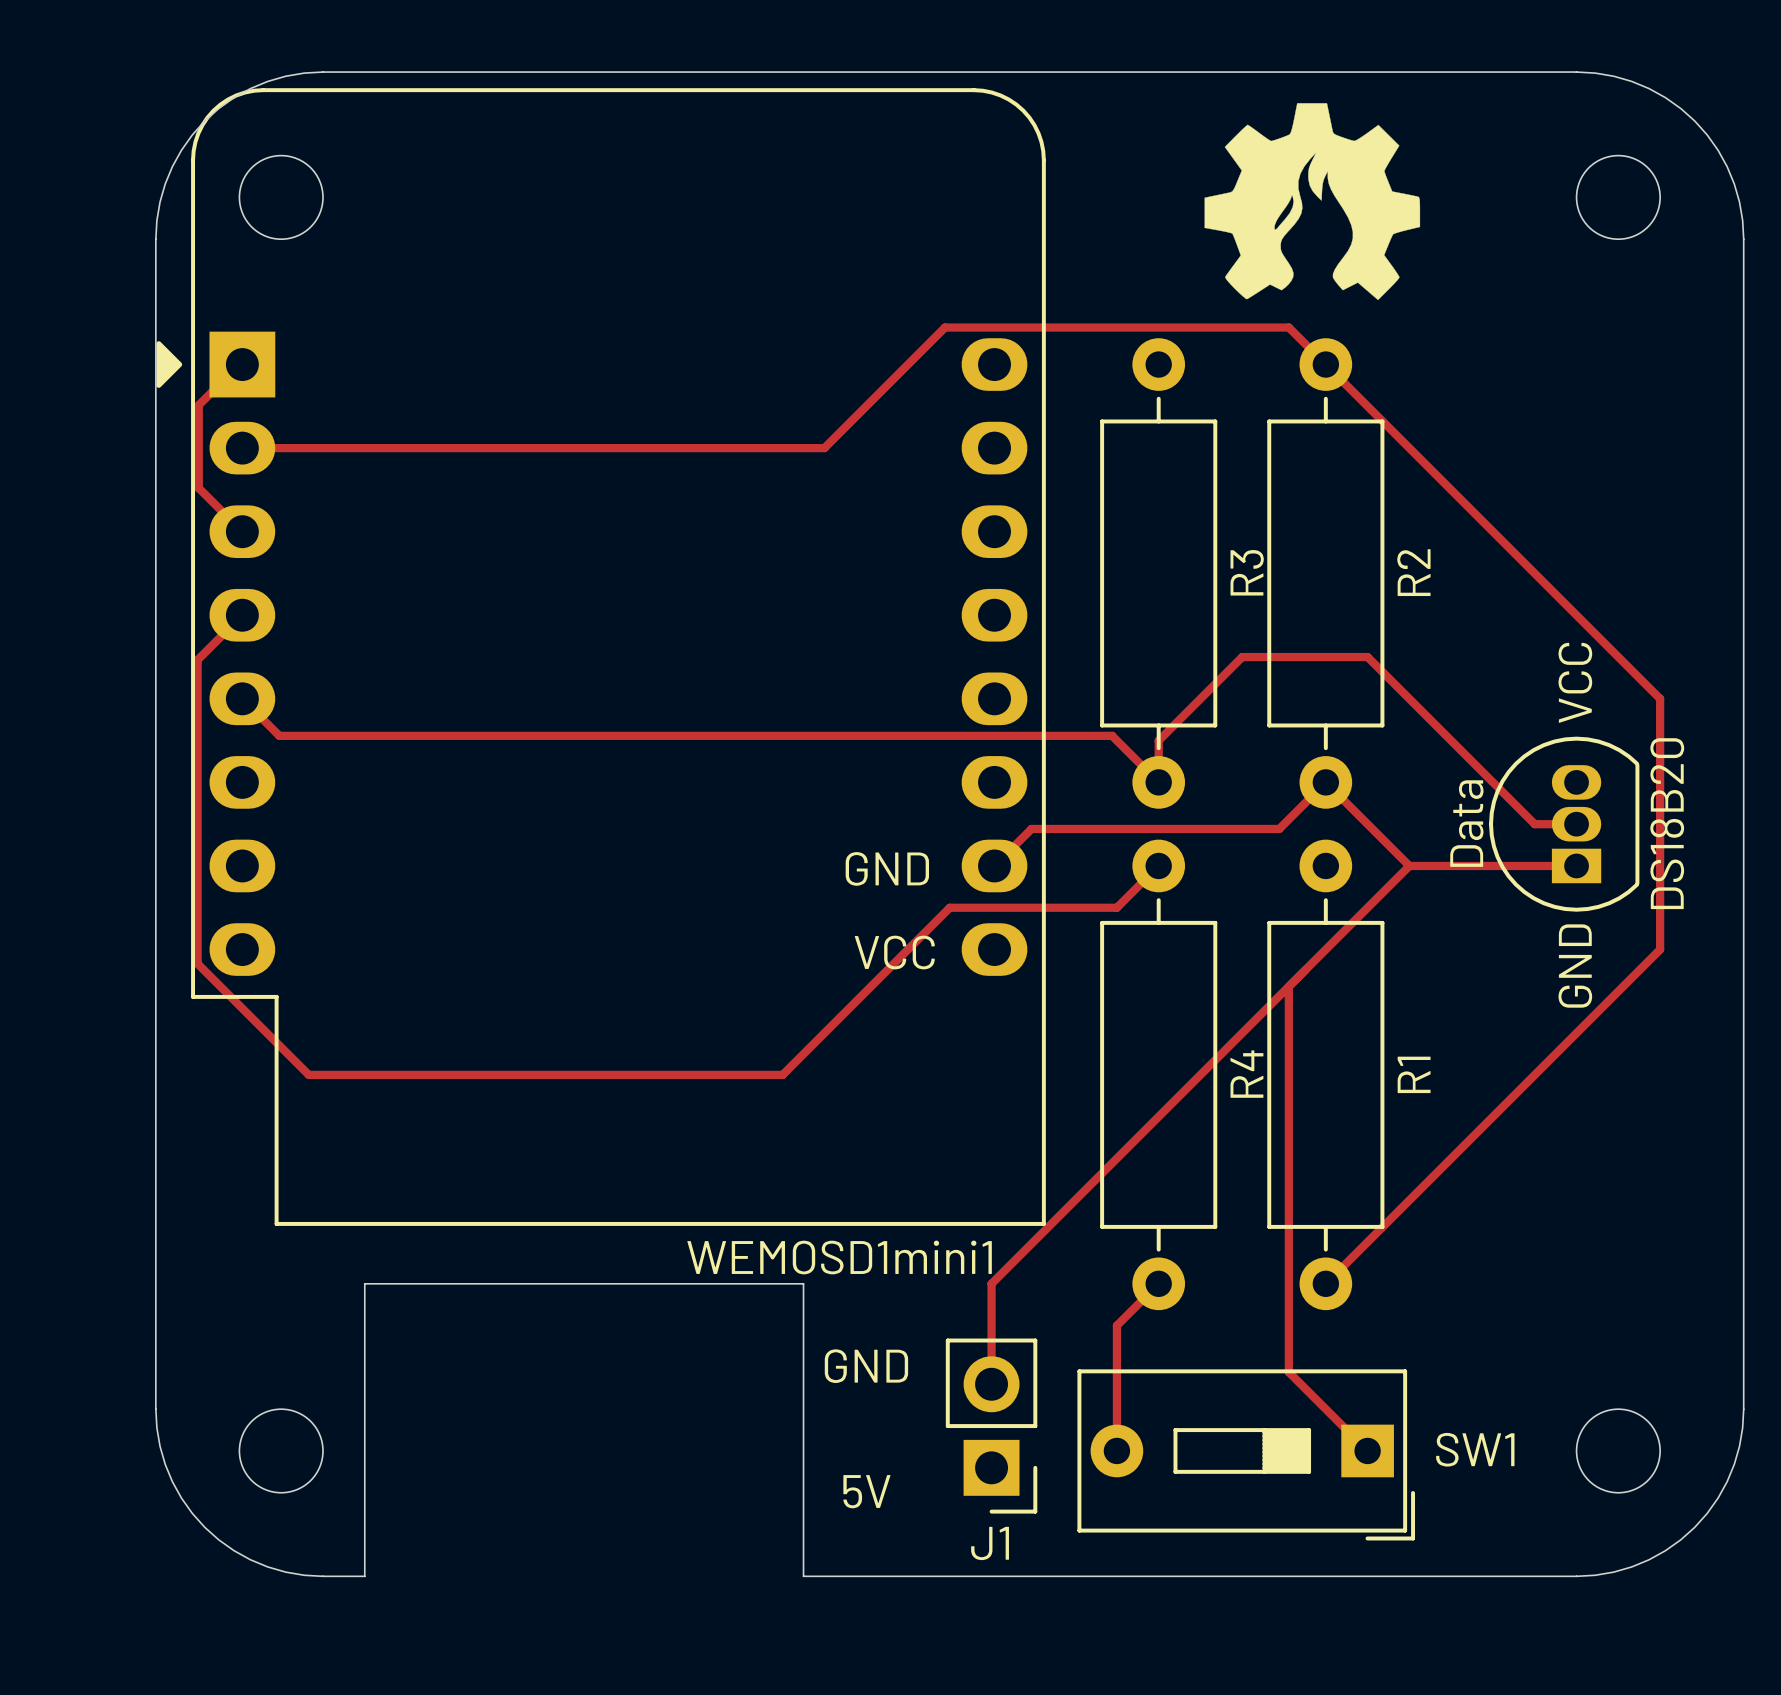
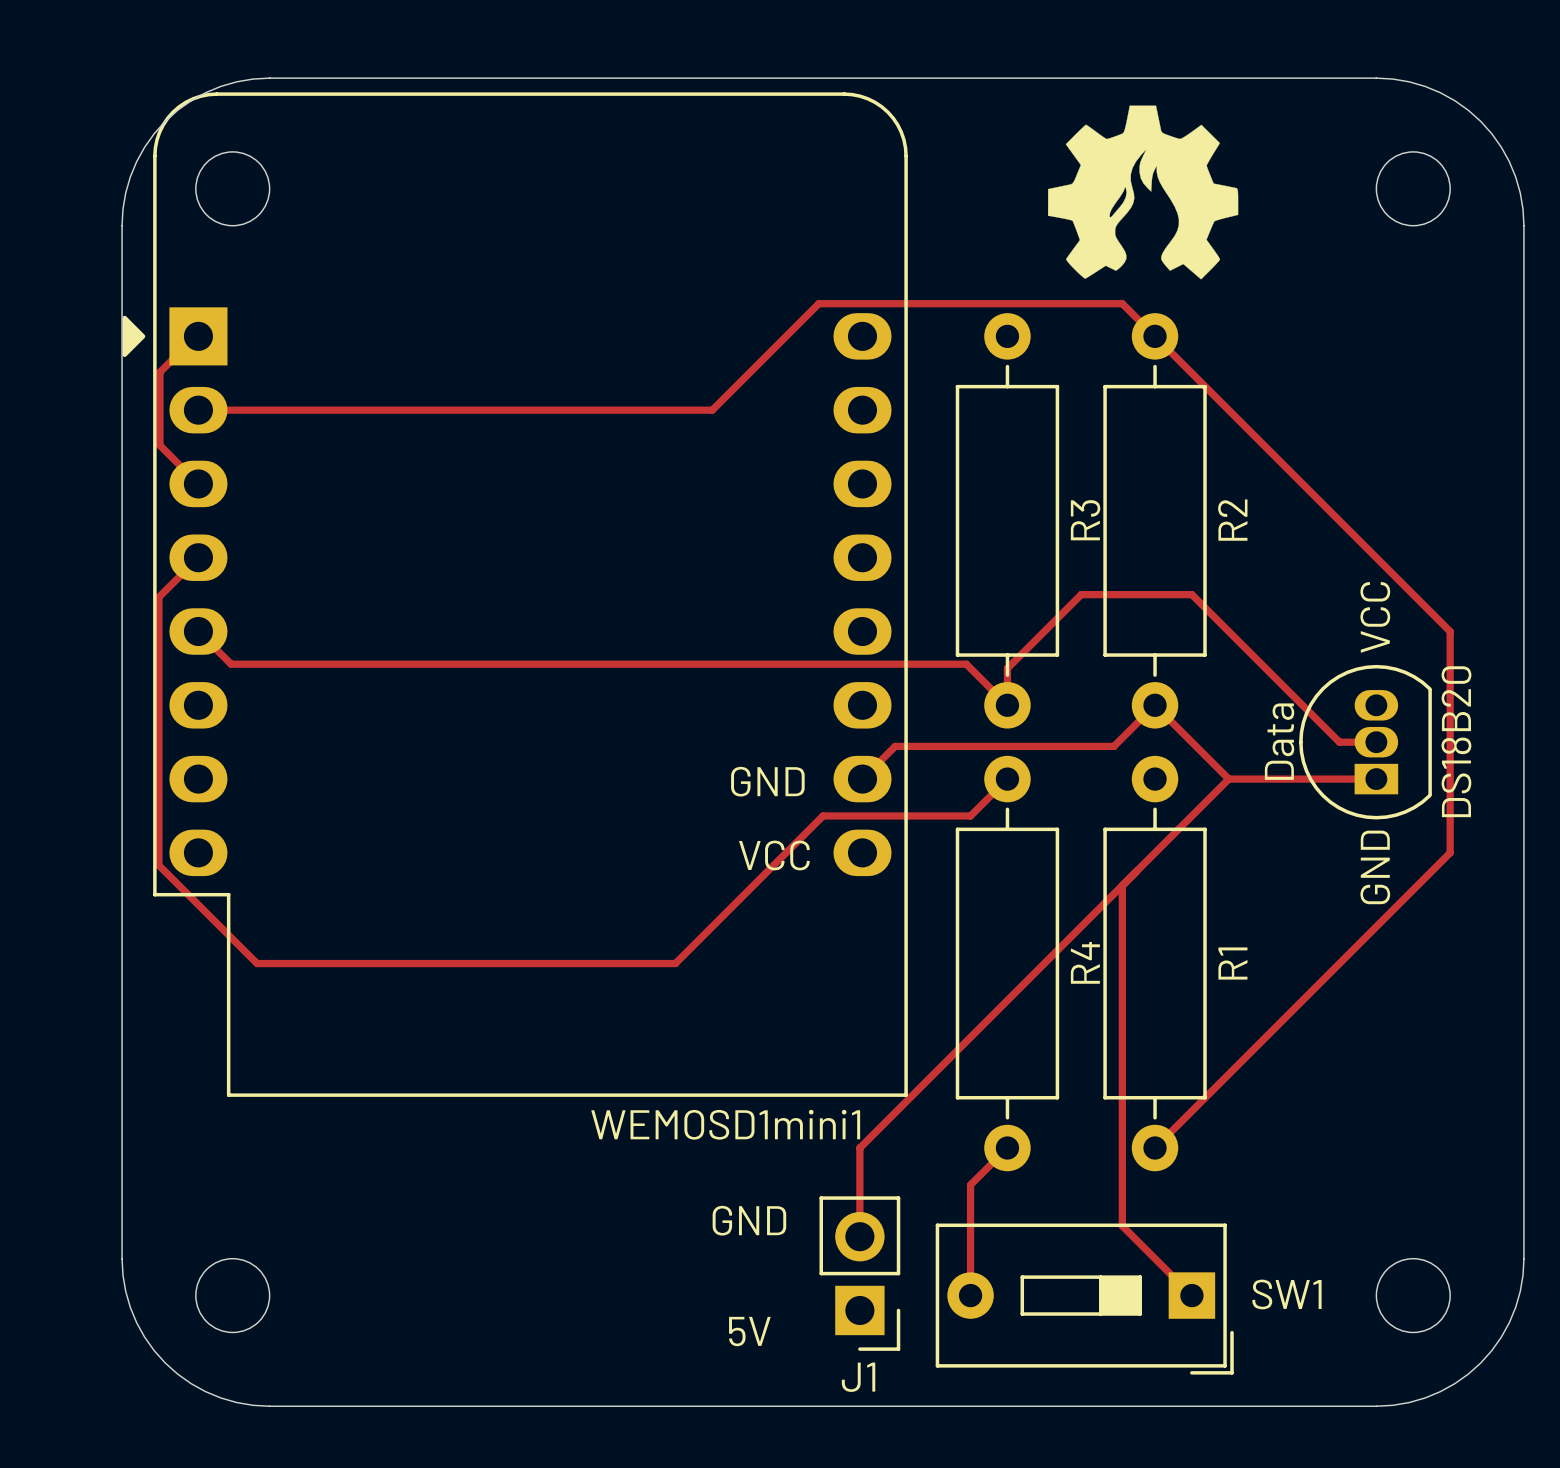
board edge: (364, 1576) (364, 1283) (803, 1283) (803, 1576) -> (306, 1406) (693, 1406)

